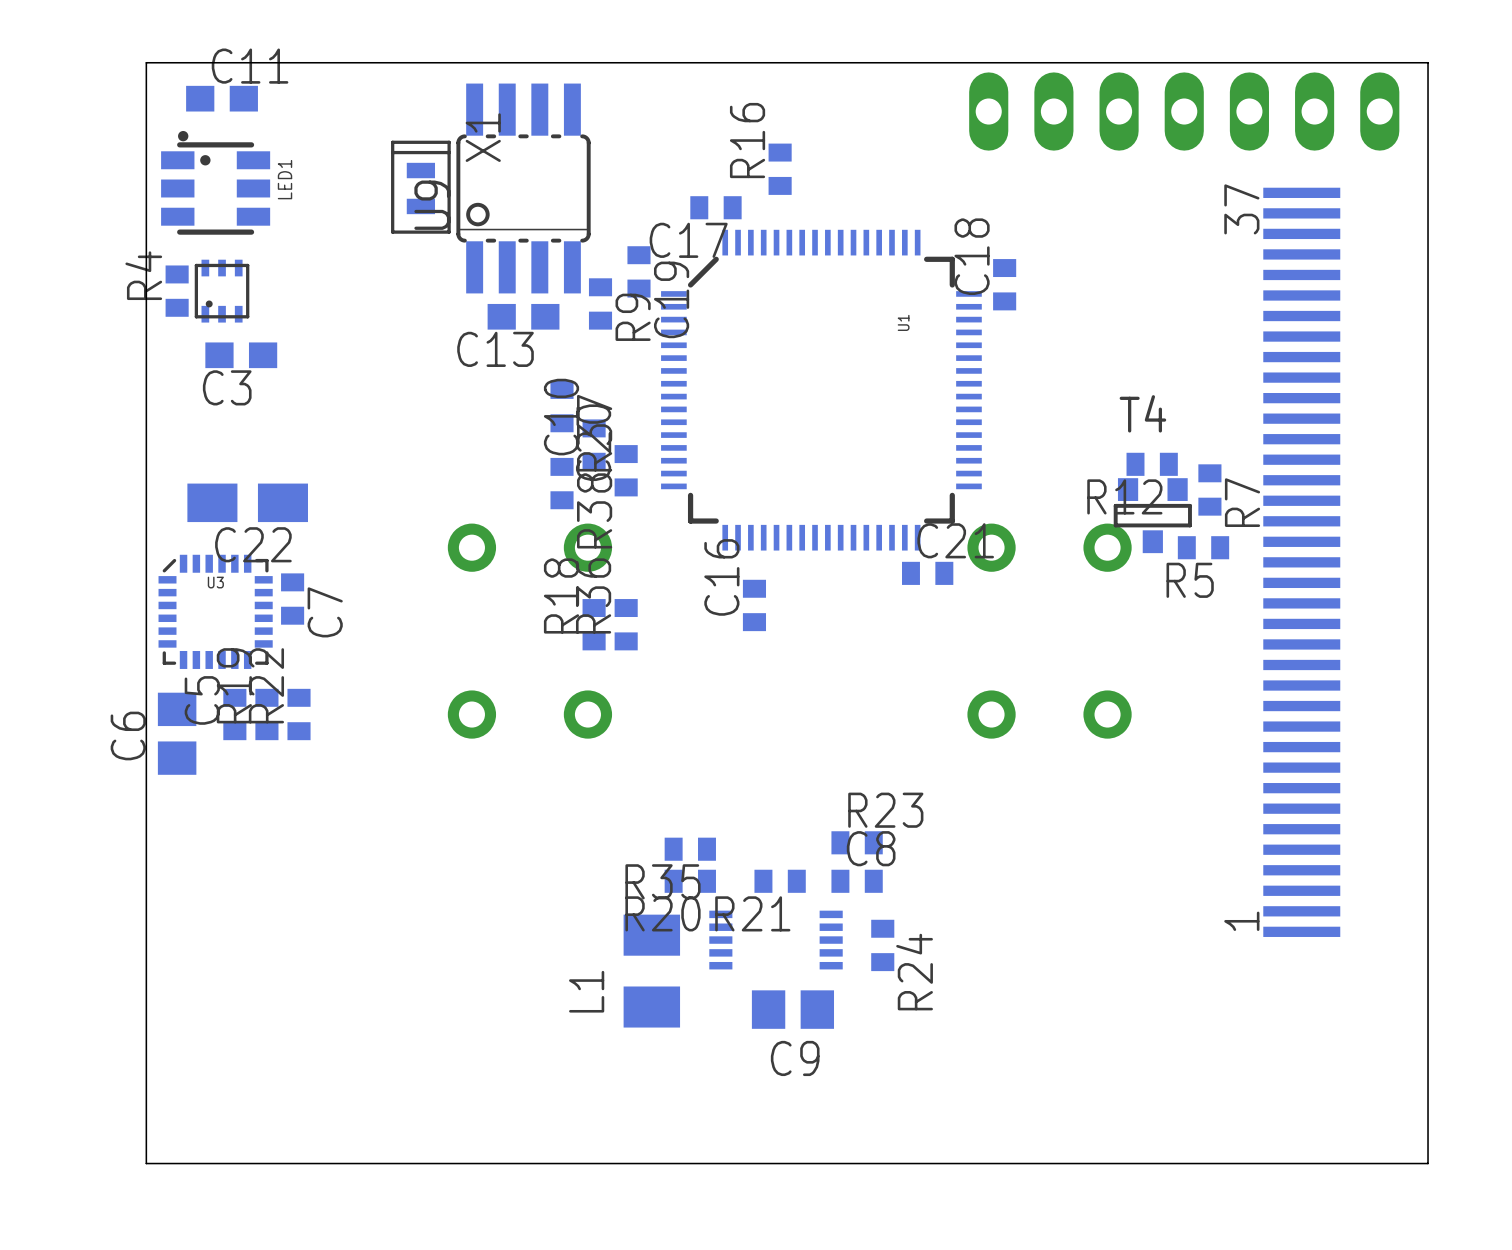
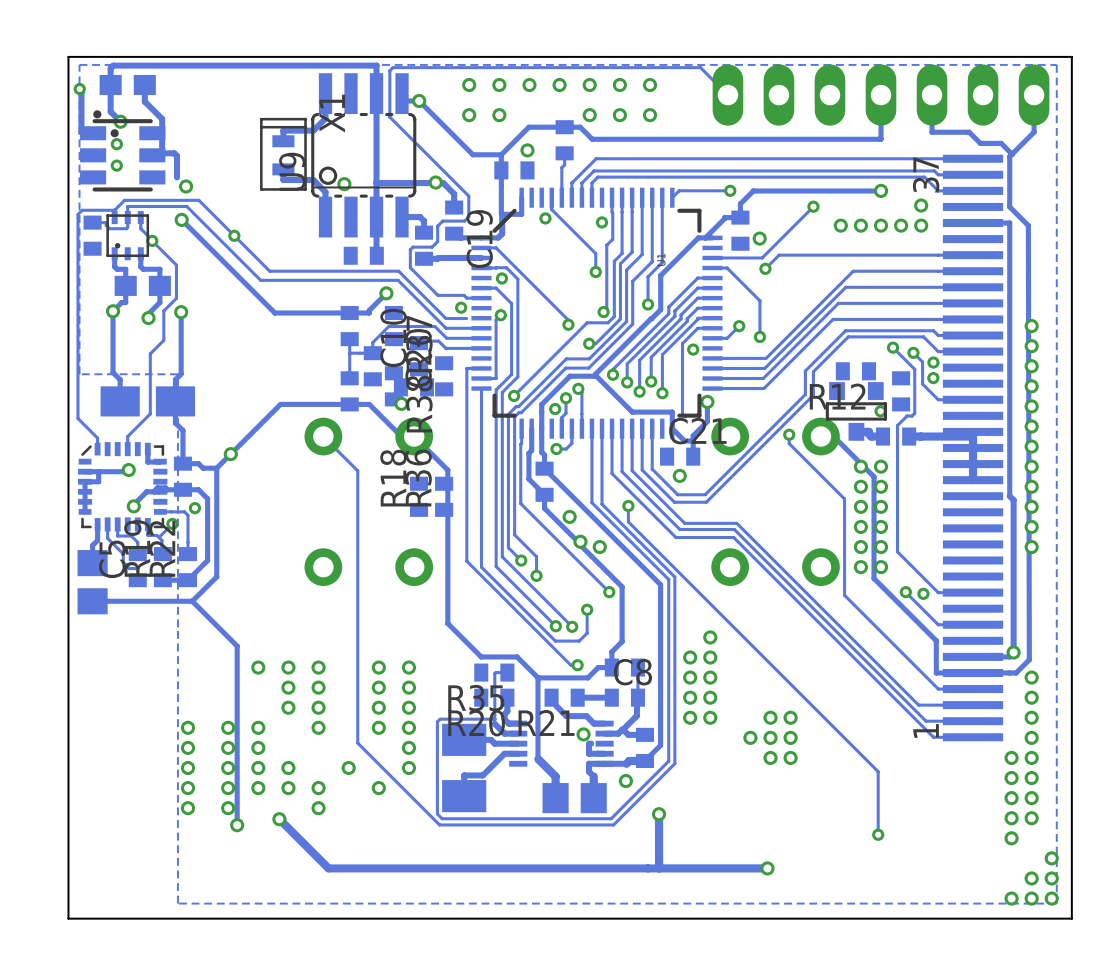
C11 name: C11 (250, 66) -> none
zone outline: none -> (1056, 64) (79, 64) (79, 374) (177, 374) (177, 903) (1056, 903) (1056, 64)
track: none -> (144, 85) (144, 101) (162, 118) (162, 155)
via: none -> (469, 85)
via: none -> (499, 85)
via: none -> (529, 85)
via: none -> (559, 85)
via: none -> (589, 85)
via: none -> (619, 85)
via: none -> (650, 85)
track: none -> (79, 89) (81, 92) (81, 132) (93, 133)
via: none -> (79, 89)
track: none -> (325, 93) (325, 118) (313, 130) (283, 130) (283, 141)
track: none -> (402, 93) (402, 100) (419, 100) (472, 154) (501, 154)
track: none -> (727, 95) (700, 67) (393, 67) (389, 70) (389, 117) (468, 196) (468, 216) (464, 221) (442, 221) (437, 226) (437, 241) (432, 247) (412, 247) (410, 249) (410, 267) (437, 295) (464, 295) (466, 298) (481, 298)
track: none -> (881, 95) (881, 139) (592, 139) (580, 127) (528, 127) (501, 154)
track: none -> (932, 95) (932, 132) (969, 132) (980, 143) (1001, 143) (1012, 154)
track: none -> (1034, 95) (1034, 132) (1009, 156) (1009, 206) (1028, 225) (1029, 659) (1016, 672) (936, 672) (936, 640) (874, 578) (874, 476) (833, 436) (820, 436)
via: none -> (419, 100)
via: none -> (469, 115)
via: none -> (499, 115)
via: none -> (589, 115)
via: none -> (619, 115)
via: none -> (650, 115)
R16 name: R16 (747, 140) -> none
track: none -> (120, 121) (110, 111) (110, 68) (113, 65) (376, 65) (376, 255)
via: none -> (120, 121)
via: none -> (116, 144)
LED1 name: LED1 (285, 179) -> none
via: none -> (527, 150)
track: none -> (564, 153) (564, 164) (561, 167) (561, 197)
track: none -> (501, 154) (502, 214)
track: none -> (162, 155) (161, 153) (174, 153) (176, 156) (176, 177)
track: none -> (973, 158) (596, 158) (571, 183) (571, 197)
via: none -> (116, 165)
track: none -> (283, 169) (283, 180) (313, 180) (325, 192) (325, 217)
track: none -> (973, 174) (938, 174) (934, 170) (594, 170) (581, 183) (581, 197)
track: none -> (376, 183) (443, 183) (454, 193) (454, 207)
via: none -> (435, 182)
via: none -> (344, 184)
via: none -> (186, 186)
track: none -> (730, 190) (679, 190) (672, 197)
via: none -> (730, 190)
track: none -> (881, 190) (753, 191) (740, 203) (740, 217) (724, 217) (705, 237)
via: none -> (881, 190)
track: none -> (973, 190) (938, 190) (924, 177) (597, 177) (591, 183) (591, 197)
C17 name: C17 (688, 240) -> none
track: none -> (521, 197) (521, 214) (502, 214)
track: none -> (551, 197) (551, 209) (595, 253) (595, 272)
track: none -> (612, 197) (612, 239) (606, 245) (606, 308) (603, 312)
track: none -> (622, 197) (622, 253) (614, 261) (614, 316) (608, 322) (587, 322) (514, 395)
track: none -> (632, 197) (632, 252) (620, 263) (620, 319) (595, 343) (589, 343)
track: none -> (642, 197) (642, 254) (626, 270) (626, 321) (589, 358) (566, 358) (508, 414) (508, 547) (521, 560)
track: none -> (652, 197) (652, 261) (632, 281) (632, 324) (588, 368) (565, 368) (521, 412) (514, 416) (514, 534) (536, 556) (536, 575)
track: none -> (662, 197) (662, 262) (648, 276) (648, 304)
via: none -> (921, 205)
track: none -> (813, 206) (762, 257) (712, 257)
via: none -> (813, 206)
C18 name: C18 (972, 256) -> none
track: none -> (114, 210) (124, 200) (198, 200) (269, 271) (398, 271) (445, 318) (466, 318)
track: none -> (114, 210) (82, 210) (77, 214) (77, 418) (97, 438) (97, 449)
track: none -> (502, 214) (502, 233) (498, 237) (460, 237) (454, 233)
track: none -> (402, 217) (420, 217) (424, 221) (424, 232)
track: none -> (140, 217) (140, 228) (176, 265) (176, 298) (163, 311) (163, 340) (150, 353) (150, 413) (127, 436) (127, 449)
via: none -> (545, 218)
track: none -> (181, 219) (274, 313) (369, 313) (369, 310) (386, 293)
via: none -> (181, 219)
track: none -> (92, 222) (106, 222) (109, 228) (126, 228) (127, 206) (186, 206) (260, 280) (398, 280) (446, 328) (481, 328)
via: none -> (602, 222)
track: none -> (973, 223) (1009, 223) (1009, 496) (1013, 500) (1013, 652) (1009, 656) (973, 656)
R4 name: R4 (143, 275) -> none
via: none -> (840, 225)
via: none -> (860, 225)
via: none -> (881, 225)
via: none -> (901, 225)
via: none -> (921, 225)
via: none -> (234, 235)
track: none -> (712, 237) (698, 237) (660, 275) (660, 309) (595, 375)
via: none -> (759, 238)
via: none -> (152, 240)
track: none -> (481, 247) (496, 247) (568, 320) (568, 324)
track: none -> (114, 253) (114, 266) (117, 269) (125, 269) (125, 302) (121, 302) (113, 311) (113, 372) (120, 379) (120, 401)
track: none -> (140, 253) (140, 266) (143, 269) (159, 269) (159, 302) (148, 313) (148, 318)
C13: (523, 316) -> none
part: none -> (363, 255)
track: none -> (973, 255) (779, 255) (765, 268)
R9 name: R9 (633, 317) -> none
track: none -> (481, 257) (424, 258)
track: none -> (481, 268) (506, 267) (517, 279) (517, 376) (502, 392) (502, 556) (572, 626)
track: none -> (712, 268) (727, 268) (759, 300) (759, 336)
via: none -> (765, 268)
track: none -> (973, 271) (853, 271) (766, 358) (712, 358)
via: none -> (595, 272)
via: none -> (501, 278)
track: none -> (712, 278) (697, 278) (668, 307) (668, 313) (612, 369) (612, 374)
track: none -> (973, 287) (845, 287) (764, 368) (712, 368)
track: none -> (481, 288) (496, 288) (511, 303) (511, 374) (496, 389) (496, 566) (555, 626)
track: none -> (712, 288) (697, 288) (674, 311) (674, 316) (627, 364) (627, 382)
via: none -> (386, 293)
track: none -> (712, 298) (697, 298) (681, 314) (681, 318) (639, 360) (639, 391)
track: none -> (973, 303) (838, 303) (763, 378) (712, 378)
via: none -> (648, 304)
via: none -> (461, 307)
track: none -> (712, 308) (697, 308) (651, 357) (651, 381)
via: none -> (113, 311)
C3 name: C3 (227, 387) -> none
track: none -> (181, 312) (181, 374) (175, 379) (175, 423) (182, 430) (182, 463) (198, 463) (203, 468) (216, 468)
via: none -> (181, 312)
via: none -> (603, 312)
track: none -> (500, 315) (496, 319) (496, 378) (481, 378)
via: none -> (500, 315)
via: none -> (148, 318)
track: none -> (712, 318) (697, 318) (662, 354) (662, 393)
track: none -> (973, 319) (833, 319) (763, 388) (712, 388)
via: none -> (568, 324)
part: none -> (349, 326)
track: none -> (739, 326) (727, 338) (712, 338)
via: none -> (739, 326)
via: none -> (1031, 326)
track: none -> (712, 328) (697, 328) (682, 343) (682, 414) (685, 416)
T4 name: T4 (1142, 413) -> none
track: none -> (973, 335) (938, 335) (933, 330) (845, 330) (805, 370) (805, 394) (705, 494) (677, 494) (652, 469) (652, 428)
via: none -> (759, 336)
track: none -> (481, 338) (446, 338) (435, 326) (388, 326) (372, 342) (372, 353) (349, 353)
track: none -> (349, 339) (349, 378)
track: none -> (427, 341) (438, 341) (445, 348) (481, 348)
via: none -> (589, 343)
via: none -> (1031, 346)
track: none -> (893, 347) (914, 369) (914, 413) (912, 416) (907, 416) (897, 425) (897, 551) (938, 592) (973, 592)
via: none -> (893, 347)
via: none -> (693, 349)
track: none -> (973, 351) (938, 351) (923, 336) (848, 336) (813, 371) (813, 395) (706, 502) (674, 502) (642, 469) (642, 428)
track: none -> (913, 352) (922, 361) (922, 384) (938, 399) (973, 399)
via: none -> (913, 352)
via: none -> (933, 362)
part: none -> (372, 366)
via: none -> (1031, 366)
track: none -> (481, 368) (466, 368) (466, 561) (570, 665) (577, 665)
via: none -> (612, 374)
track: none -> (595, 375) (632, 412) (672, 412) (672, 428) (684, 441) (693, 441)
track: none -> (595, 375) (570, 376) (541, 404) (541, 452) (544, 455) (544, 468) (660, 584) (660, 745) (644, 760) (629, 760) (626, 763) (589, 763) (589, 771) (593, 776) (593, 798)
via: none -> (933, 378)
via: none -> (651, 381)
via: none -> (627, 382)
via: none -> (1031, 386)
part: none -> (413, 387)
track: none -> (481, 388) (481, 567) (555, 641) (579, 641) (587, 633) (587, 609)
track: none -> (578, 388) (581, 392) (581, 428)
via: none -> (578, 388)
part: none -> (349, 391)
via: none -> (639, 391)
via: none -> (662, 393)
via: none -> (514, 395)
track: none -> (566, 398) (566, 413) (561, 417) (561, 428)
via: none -> (566, 398)
R7 name: R7 (1242, 502) -> none
track: none -> (707, 401) (707, 421) (693, 435) (693, 456)
via: none -> (707, 401)
via: none -> (401, 403)
via: none -> (1031, 406)
via: none -> (555, 409)
via: none -> (880, 411)
via: none -> (1031, 426)
track: none -> (521, 428) (520, 503) (609, 592)
track: none -> (531, 428) (528, 479) (544, 494) (544, 508) (580, 544) (580, 541) (581, 545) (622, 586) (622, 641) (611, 651) (611, 667) (598, 667) (587, 677) (538, 677) (517, 656) (481, 656) (447, 623) (447, 470) (414, 436) (401, 436) (369, 404) (280, 404) (216, 468)
track: none -> (571, 428) (571, 443) (566, 449) (556, 449)
track: none -> (591, 428) (591, 502) (668, 579) (668, 761) (611, 818) (442, 818) (437, 814) (437, 721) (440, 719) (494, 719)
track: none -> (602, 428) (602, 504) (674, 577) (674, 763) (613, 824) (439, 824) (357, 743) (357, 470) (323, 436)
track: none -> (612, 428) (612, 473) (675, 537) (733, 537) (933, 737) (973, 737)
track: none -> (622, 428) (622, 471) (679, 529) (734, 529) (926, 721) (973, 721)
track: none -> (632, 428) (632, 470) (684, 523) (736, 523) (918, 705) (973, 705)
track: none -> (856, 431) (868, 431) (871, 436) (883, 436)
C22 name: C22 (253, 544) -> none
track: none -> (789, 434) (789, 443) (844, 498) (844, 595) (938, 689) (973, 689)
via: none -> (789, 434)
track: none -> (973, 436) (973, 480)
track: none -> (973, 436) (909, 436)
via: none -> (1031, 446)
track: none -> (147, 449) (147, 462) (160, 461)
via: none -> (556, 449)
via: none -> (230, 454)
C16 name: C16 (721, 577) -> none
R5 name: R5 (1190, 580) -> none
via: none -> (860, 466)
via: none -> (881, 466)
via: none -> (1031, 466)
track: none -> (216, 468) (216, 576) (192, 601)
track: none -> (128, 470) (127, 471) (85, 471)
via: none -> (128, 470)
track: none -> (98, 471) (98, 481) (85, 481) (85, 511)
via: none -> (679, 475)
U3: (215, 611) -> none
part: none -> (122, 486)
via: none -> (860, 486)
via: none -> (881, 486)
via: none -> (1031, 486)
C7 name: C7 (325, 612) -> none
track: none -> (153, 491) (157, 487) (198, 489) (207, 498) (207, 560) (187, 580) (162, 580)
track: none -> (160, 491) (146, 491) (133, 506)
via: none -> (133, 506)
track: none -> (628, 506) (628, 521) (878, 771) (878, 834)
via: none -> (628, 506)
via: none -> (860, 506)
via: none -> (881, 506)
via: none -> (1031, 506)
via: none -> (194, 508)
track: none -> (160, 511) (184, 511) (187, 515) (187, 554)
via: none -> (569, 516)
track: none -> (97, 524) (97, 540) (92, 545) (92, 563)
track: none -> (107, 524) (107, 538) (123, 553) (123, 562) (129, 568) (137, 568) (137, 580)
track: none -> (117, 524) (117, 536) (131, 536) (137, 542) (137, 554)
track: none -> (147, 524) (147, 535) (156, 535) (161, 540) (162, 554)
track: none -> (172, 523) (158, 537)
via: none -> (172, 523)
via: none -> (860, 526)
via: none -> (881, 526)
via: none -> (1031, 526)
via: none -> (580, 541)
via: none -> (599, 547)
via: none -> (860, 547)
via: none -> (881, 547)
via: none -> (1031, 547)
via: none -> (521, 560)
via: none -> (860, 567)
via: none -> (881, 567)
via: none -> (536, 575)
C6 name: C6 (128, 735) -> none
via: none -> (609, 592)
track: none -> (905, 592) (938, 624) (973, 624)
via: none -> (905, 592)
via: none -> (923, 593)
track: none -> (192, 601) (92, 601)
track: none -> (192, 601) (237, 646) (237, 825)
via: none -> (587, 609)
via: none -> (555, 626)
via: none -> (572, 626)
via: none -> (710, 637)
R23 name: R23 (885, 810) -> none
via: none -> (1013, 652)
via: none -> (690, 657)
via: none -> (710, 657)
via: none -> (577, 665)
via: none -> (258, 667)
via: none -> (288, 667)
via: none -> (318, 667)
via: none -> (378, 667)
via: none -> (408, 667)
track: none -> (637, 667) (636, 715) (623, 729)
track: none -> (507, 672) (494, 673) (494, 723) (504, 733) (518, 733)
via: none -> (690, 677)
via: none -> (710, 677)
via: none -> (1031, 677)
track: none -> (537, 678) (537, 758) (555, 776) (555, 798)
via: none -> (288, 687)
via: none -> (318, 687)
via: none -> (378, 687)
via: none -> (408, 687)
track: none -> (507, 697) (507, 711) (504, 714) (504, 719) (508, 723) (518, 723)
track: none -> (551, 697) (556, 705) (566, 716) (586, 716) (593, 723) (604, 723)
track: none -> (611, 697) (577, 697)
via: none -> (690, 697)
via: none -> (710, 697)
via: none -> (1031, 697)
via: none -> (288, 707)
via: none -> (318, 707)
via: none -> (378, 707)
via: none -> (408, 707)
via: none -> (690, 717)
via: none -> (710, 717)
via: none -> (770, 717)
via: none -> (790, 717)
via: none -> (1031, 717)
via: none -> (187, 727)
via: none -> (228, 727)
via: none -> (258, 727)
via: none -> (318, 727)
via: none -> (378, 727)
via: none -> (408, 727)
track: none -> (623, 729) (628, 734) (644, 734)
track: none -> (623, 729) (618, 733) (604, 733)
via: none -> (583, 734)
via: none -> (750, 737)
via: none -> (770, 737)
via: none -> (790, 737)
via: none -> (1031, 737)
track: none -> (464, 739) (490, 739) (494, 743) (518, 743)
track: none -> (591, 743) (589, 743) (589, 753) (604, 753)
via: none -> (187, 747)
via: none -> (228, 747)
via: none -> (258, 747)
via: none -> (408, 747)
track: none -> (518, 753) (504, 753) (482, 775) (464, 775) (464, 796)
via: none -> (770, 757)
via: none -> (790, 757)
via: none -> (1011, 757)
via: none -> (1031, 757)
via: none -> (187, 767)
via: none -> (228, 767)
via: none -> (258, 767)
via: none -> (288, 767)
via: none -> (348, 767)
via: none -> (408, 767)
R24 name: R24 (914, 972) -> none
via: none -> (1011, 778)
via: none -> (1031, 778)
via: none -> (625, 781)
L1 name: L1 (586, 991) -> none
via: none -> (187, 788)
via: none -> (228, 788)
via: none -> (258, 788)
via: none -> (288, 788)
via: none -> (318, 788)
via: none -> (378, 788)
via: none -> (1011, 798)
via: none -> (1031, 798)
via: none -> (187, 808)
via: none -> (228, 808)
via: none -> (318, 808)
track: none -> (659, 814) (659, 868)
via: none -> (659, 814)
via: none -> (1011, 818)
via: none -> (1031, 818)
track: none -> (279, 819) (328, 868) (659, 868)
via: none -> (279, 819)
via: none -> (237, 825)
via: none -> (878, 834)
C9 name: C9 (795, 1058) -> none
via: none -> (1011, 838)
via: none -> (1051, 858)
track: none -> (767, 868) (659, 868)
via: none -> (767, 868)
via: none -> (1031, 878)
via: none -> (1051, 878)
via: none -> (1011, 898)
via: none -> (1031, 898)
via: none -> (1051, 898)

